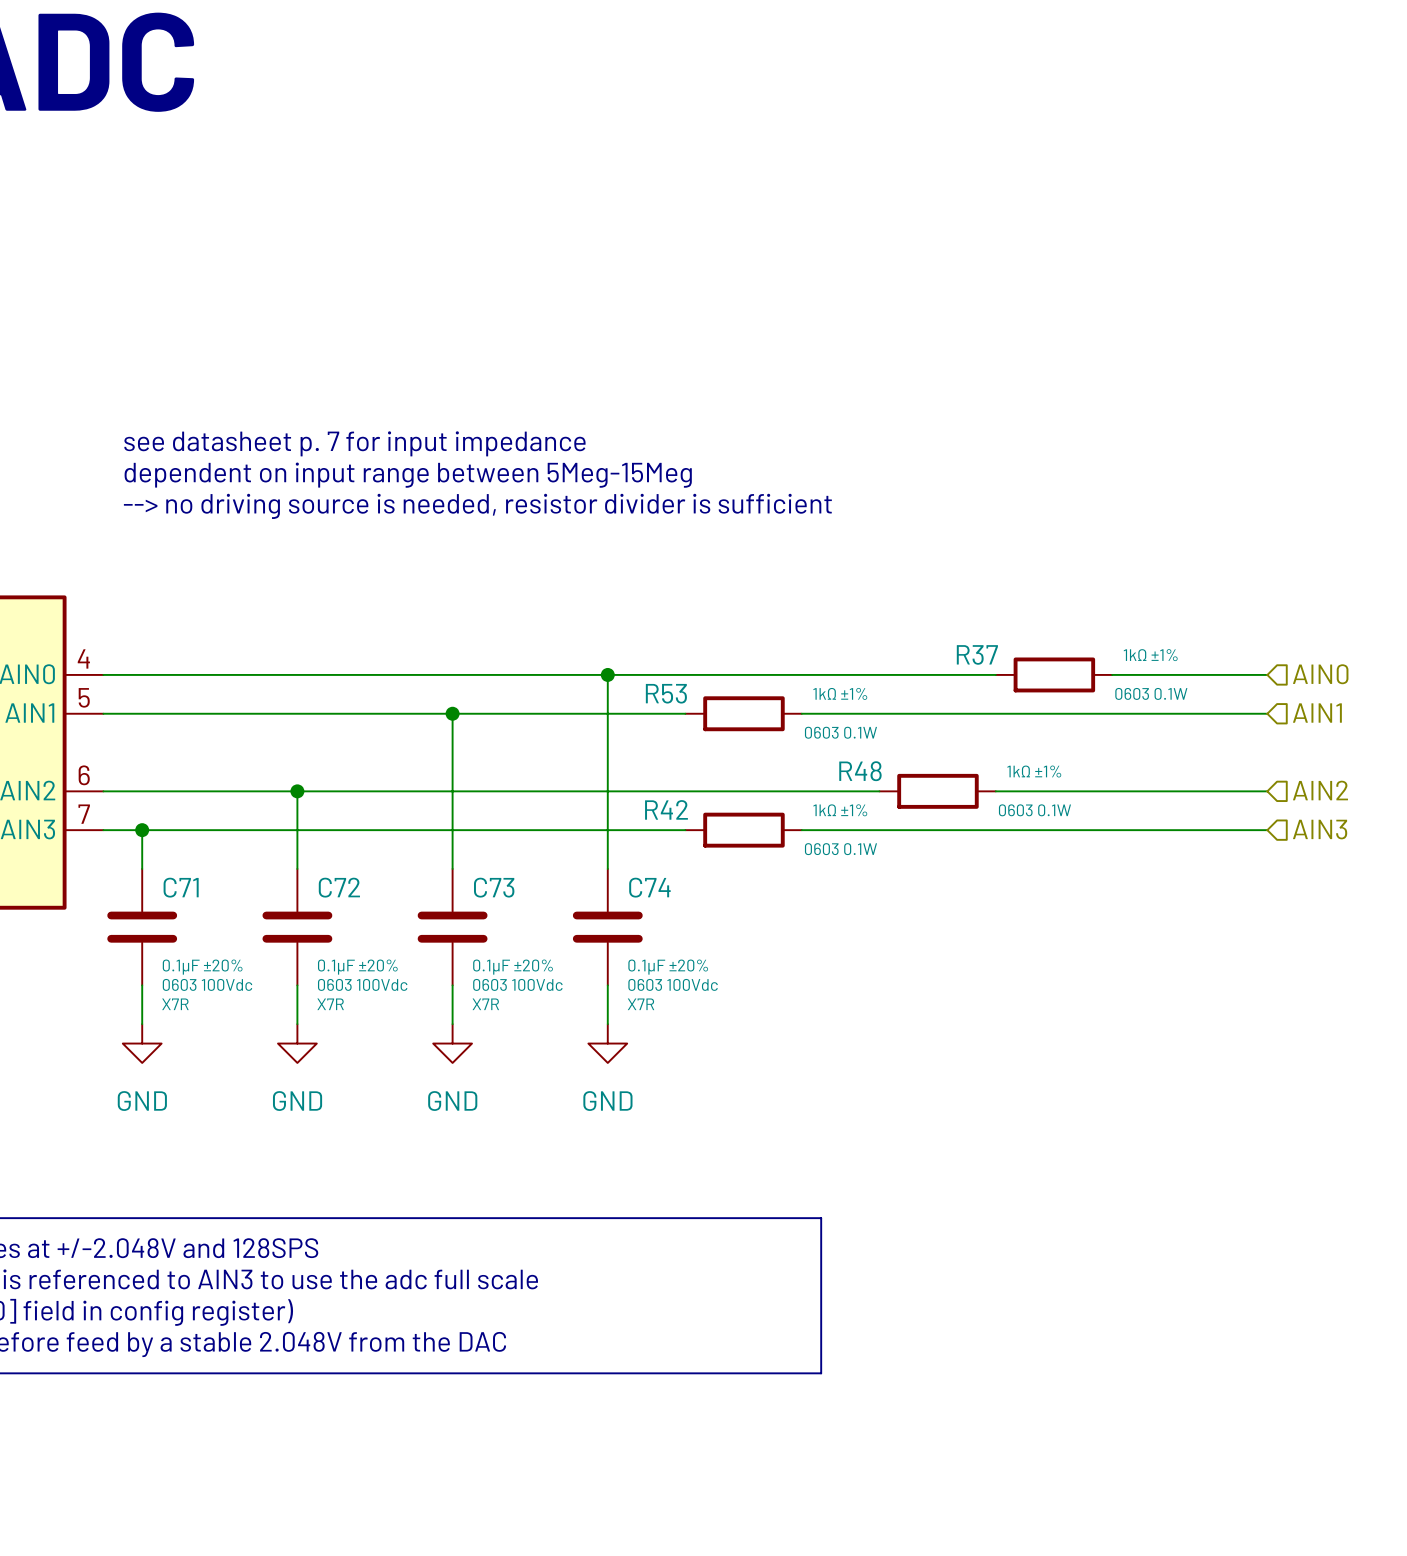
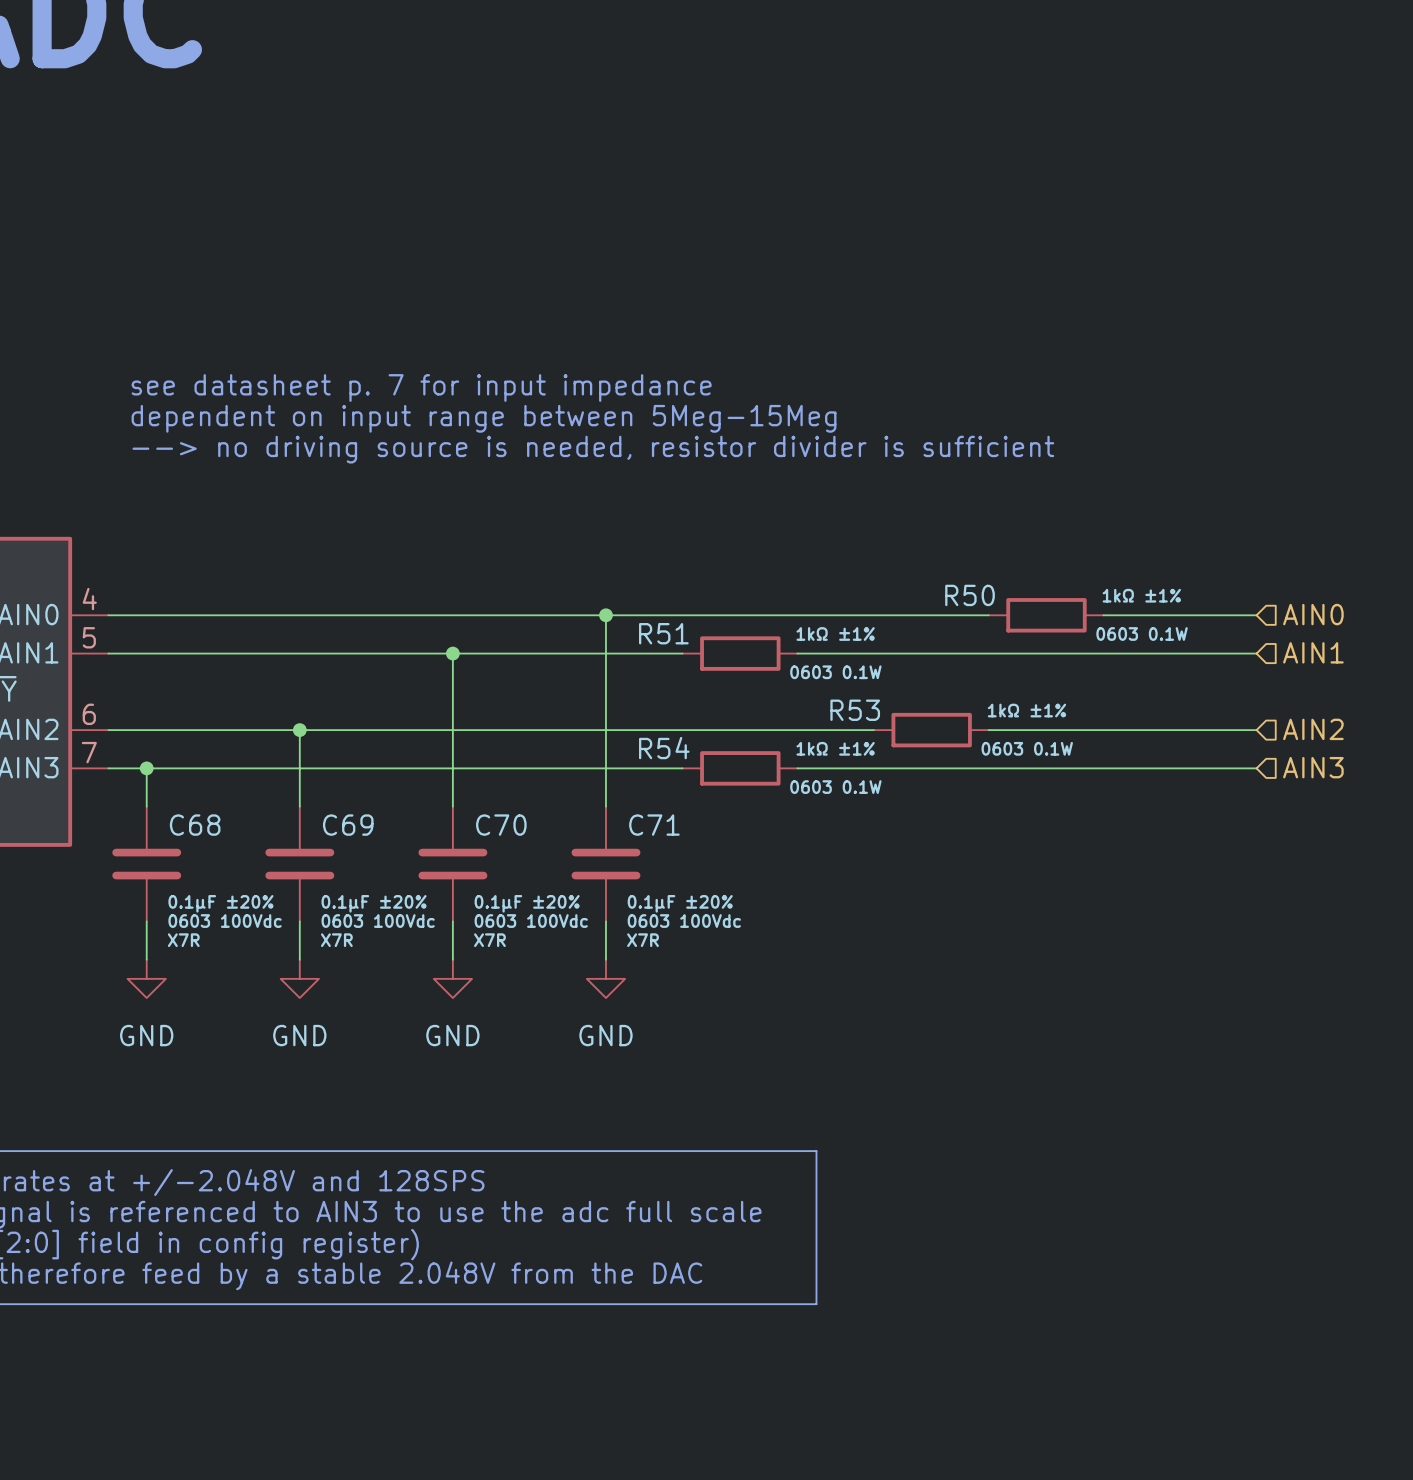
R37 name: R37 (977, 654) -> R50 (970, 595)
R53 name: R53 (666, 693) -> R51 (663, 633)
R48 name: R48 (860, 771) -> R53 (855, 710)
R42 name: R42 (666, 809) -> R54 (664, 748)
C71 name: C71 (181, 887) -> C68 (195, 825)
C72 name: C72 (339, 887) -> C69 (348, 825)
C73 name: C73 (494, 887) -> C70 (501, 825)
C74 name: C74 (649, 887) -> C71 (654, 825)

